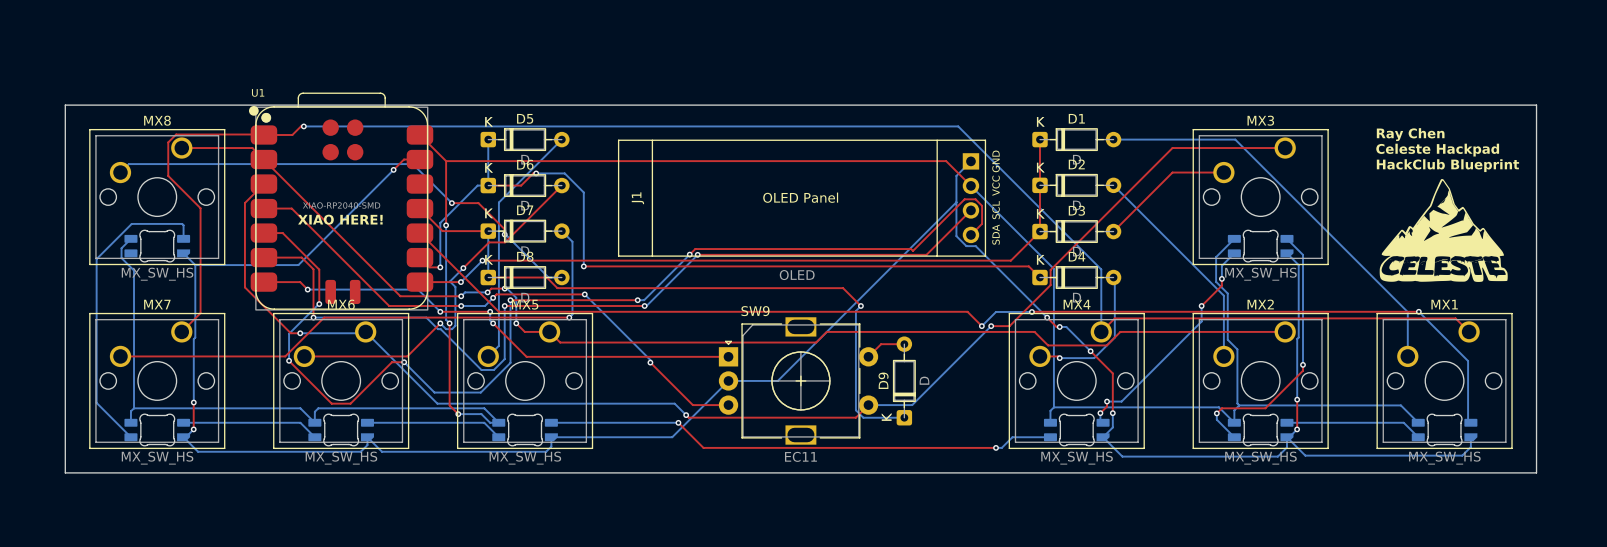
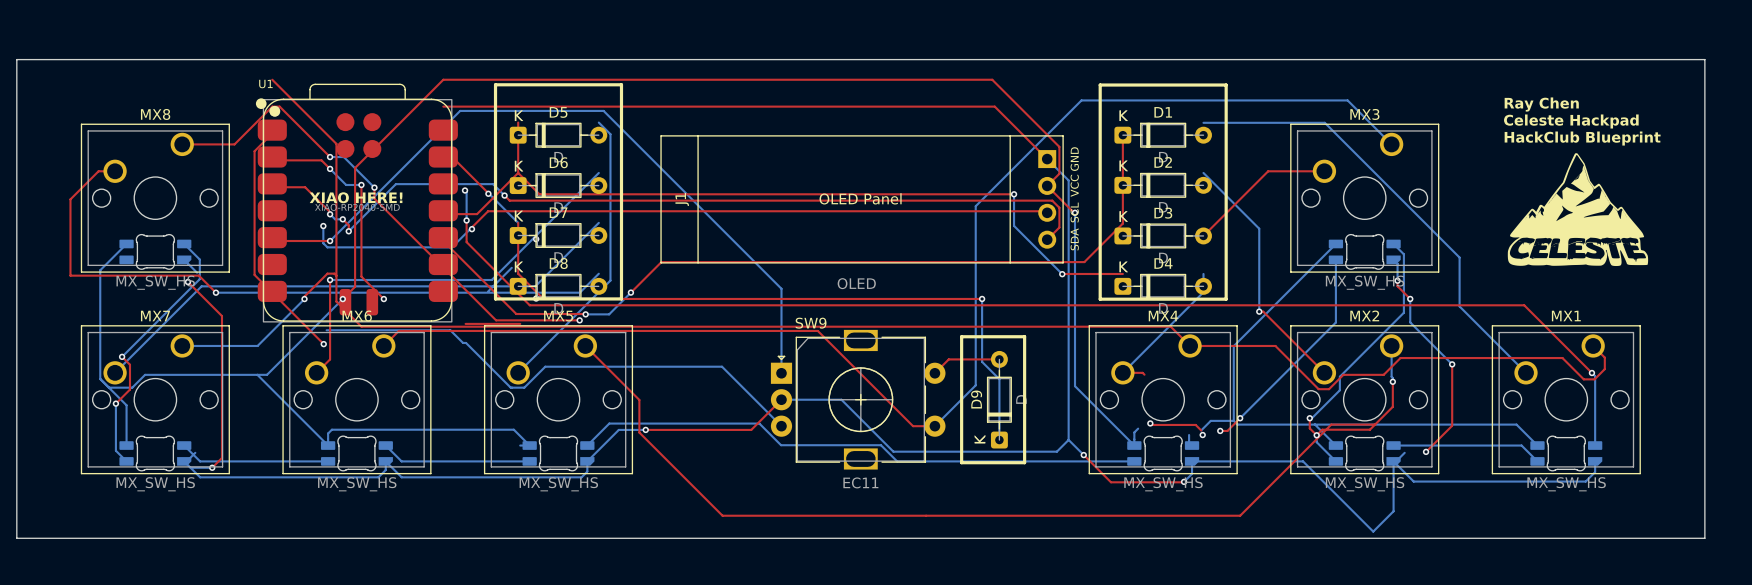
top track: none -> (272, 79) (336, 143) (336, 301) (361, 326) (1170, 326) (1190, 345) (1211, 345)
line: none -> (495, 84) (621, 84) (621, 298) (495, 298) (495, 84)
line: none -> (1100, 85) (1226, 85) (1226, 299) (1100, 299) (1100, 85)
board edge: (65, 105) (1536, 105) (1536, 472) (65, 472) (65, 105) -> (16, 59) (16, 538) (1704, 538) (1704, 59) (16, 59)
top track: none -> (443, 106) (994, 106) (1047, 159)
top track: (303, 126) (300, 126) (292, 134) (176, 134) (168, 142) (168, 175) (200, 208) (200, 313) (181, 331) -> none
bottom track: (303, 126) (958, 126) (1101, 269) (1101, 331) -> none
via: (303, 126) -> none
top track: none -> (518, 122) (518, 172)
top track: (419, 134) (446, 161) -> none
text position: Ray Chen (1410, 134) -> Ray Chen (1541, 104)
top track: none -> (272, 133) (254, 151) (254, 274) (323, 344)
bottom track: (488, 139) (488, 185) (477, 185) (440, 222) (440, 267) -> none
bottom track: (561, 139) (498, 202) (498, 345) -> none
bottom track: (1113, 139) (1235, 139) (1407, 312) (1407, 356) -> (1203, 122) (1324, 122) (1459, 257) (1459, 306) (1525, 372)
top track: (229, 148) (252, 148) (400, 296) (461, 296) -> (234, 144) (272, 106) (279, 106) (330, 157)
top track: (1285, 148) (1172, 148) (1050, 269) (1050, 285) (1009, 326) (991, 326) -> none
text position: Celeste Hackpad (1437, 150) -> Celeste Hackpad (1571, 121)
bottom track: none -> (330, 157) (343, 157) (374, 187)
via: none -> (330, 157)
top track: (419, 159) (403, 159) (393, 169) -> none
top track: (446, 161) (946, 161) (970, 185) -> none
top track: (446, 161) (446, 225) -> none
bottom track: (970, 161) (956, 175) (956, 236) (966, 246) (975, 246) (1047, 317) -> (1047, 159) (1068, 180) (1068, 439)
top track: none -> (272, 160) (321, 160) (330, 168)
top track: none -> (443, 160) (455, 160) (488, 193)
text position: HackClub Blueprint (1447, 165) -> HackClub Blueprint (1582, 138)
bottom track: (393, 169) (298, 265) (195, 265) (193, 402) -> none
via: (393, 169) -> none
bottom track: none -> (330, 168) (346, 184) (361, 184)
via: none -> (330, 168)
top track: none -> (115, 171) (98, 171) (70, 199) (70, 275) (198, 275) (215, 292)
bottom track: (120, 172) (128, 164) (412, 164) (451, 203) -> none
top track: (536, 173) (533, 173) (521, 185) (488, 185) -> none
bottom track: (536, 173) (564, 173) (583, 192) (583, 266) -> none
via: (536, 173) -> none
top track: none -> (518, 172) (539, 194) (1014, 194)
top track: none -> (518, 172) (477, 214) (443, 214)
bottom track: none -> (598, 172) (491, 280) (330, 280)
bottom track: none -> (1203, 172) (1259, 228) (1259, 311)
top track: (263, 184) (244, 203) (244, 287) (290, 333) (300, 333) -> none
top track: none -> (361, 184) (361, 276) (383, 299)
via: none -> (361, 184)
top track: (561, 185) (505, 242) (489, 242) (463, 268) -> none
bottom track: (970, 185) (1053, 268) (1053, 407) (1218, 407) -> (1314, 424) (1319, 428)
bottom track: (1113, 185) (1223, 295) (1223, 356) -> none
top track: none -> (272, 187) (305, 187) (330, 214)
top track: none -> (374, 187) (374, 198) (496, 320) (579, 320)
via: none -> (374, 187)
bottom track: none -> (465, 190) (466, 192) (466, 220)
via: none -> (465, 190)
bottom track: none -> (488, 193) (518, 222)
via: none -> (488, 193)
bottom track: none -> (1014, 194) (1014, 225) (1062, 274)
via: none -> (1014, 194)
bottom track: none -> (504, 195) (493, 184) (395, 184) (348, 231)
via: none -> (504, 195)
top track: (964, 199) (912, 250) (911, 249) (695, 249) (689, 254) -> (1040, 200) (509, 200) (504, 195)
bottom track: (956, 202) (777, 380) -> (1068, 439) (1056, 451) (893, 451) (841, 399) (835, 399)
top track: (451, 203) (478, 203) (504, 229) (504, 234) -> none
via: (451, 203) -> none
top track: (263, 208) (291, 208) (389, 305) (461, 305) -> none
top track: (419, 208) (442, 231) (488, 231) -> none
top track: (970, 210) (926, 254) (697, 254) -> (1047, 212) (1045, 211) (488, 211) (472, 226)
bottom track: none -> (1075, 212) (1075, 386) (1134, 445)
via: none -> (1074, 212)
bottom track: none -> (330, 214) (335, 219) (342, 219)
via: none -> (330, 214)
top track: none -> (1075, 213) (1047, 185) (1059, 173) (1059, 146) (992, 79) (443, 79) (355, 168) (355, 286) (342, 299)
top track: none -> (342, 219) (348, 225) (348, 231)
via: none -> (342, 219)
top track: none -> (466, 220) (466, 242) (529, 305) (1524, 305) (1591, 373)
via: none -> (466, 220)
text position: XIAO HERE! (340, 219) -> XIAO HERE! (356, 197)
top track: none -> (518, 222) (518, 273) (543, 298) (982, 298)
bottom track: none -> (598, 222) (535, 286) (201, 286) (115, 372)
top track: (1039, 220) (1039, 231) (1010, 260) (482, 260) -> (1122, 223) (1084, 262) (661, 262) (630, 292)
bottom track: none -> (323, 226) (323, 243) (327, 247) (451, 247) (472, 226)
via: none -> (323, 226)
bottom track: (446, 225) (446, 319) (449, 323) -> none
via: none -> (348, 231)
drawing position: (1443, 230) -> (1577, 209)
bottom track: (488, 231) (488, 277) -> none
bottom track: (561, 231) (572, 241) -> (598, 122) (610, 134) (610, 247)
top track: (263, 233) (282, 233) (319, 269) (319, 304) -> none
top track: (420, 233) (498, 311) (967, 311) (981, 326) -> none
bottom track: (504, 234) (548, 277) (561, 277) -> none
top track: none -> (272, 241) (330, 241)
bottom track: none -> (330, 241) (460, 110) (603, 110) (781, 288) (781, 373)
via: none -> (330, 241)
top track: none -> (443, 241) (516, 314) (585, 314)
bottom track: (183, 238) (182, 223) (131, 223) (96, 259) (96, 402) (121, 427) -> (184, 243) (199, 259) (199, 279) (122, 356)
bottom track: (121, 248) (121, 258) (134, 270) (134, 408) (130, 411) -> (116, 254) (100, 270) (100, 378) (126, 405) (126, 432)
bottom track: (1296, 248) (1303, 254) (1303, 364) -> (1403, 254) (1403, 312) (1339, 376) (1339, 390) (1309, 418)
bottom track: (1234, 253) (1221, 265) (1221, 278) -> (1335, 259) (1335, 322) (1240, 418)
bottom track: (689, 254) (644, 300) (637, 300) -> none
via: (689, 254) -> none
bottom track: (697, 254) (644, 305) -> none
via: (697, 254) -> none
bottom track: (1290, 256) (1298, 265) (1297, 399) -> (1397, 263) (1397, 280)
top track: (263, 257) (301, 257) (313, 269) (313, 317) -> none
top track: (419, 257) (429, 267) (440, 267) -> none
bottom track: (1216, 257) (1216, 281) (1227, 293) (1227, 339) (1237, 349) (1237, 403) (1239, 405) -> (1315, 263) (1233, 346) (1233, 420)
via: (482, 260) -> none
bottom track: none -> (598, 273) (579, 292) (215, 292)
top track: (583, 266) (1028, 266) (1039, 277) -> none
via: (583, 266) -> none
via: none -> (1062, 274)
top track: none -> (1122, 273) (1062, 274)
bottom track: none -> (1203, 273) (1203, 292) (1122, 372)
top track: none -> (336, 275) (334, 273) (327, 273) (304, 296) (304, 299)
via: (440, 267) -> none
bottom track: (463, 268) (449, 281) (455, 286) (455, 325) (452, 329) (446, 329) (440, 323) -> none
via: (463, 268) -> none
via: none -> (330, 280)
bottom track: (572, 272) (572, 314) (569, 317) -> (610, 280) (529, 361)
top track: none -> (1397, 280) (1397, 286) (1410, 298)
via: none -> (1397, 280)
top track: none -> (187, 282) (221, 316) (221, 458) (212, 467)
via: none -> (187, 282)
top track: (488, 277) (546, 277) (557, 288) (843, 288) (860, 305) -> none
bottom track: (1113, 277) (1114, 337) (1094, 358) (1059, 358) -> none
top track: (1221, 278) (1221, 285) (1201, 305) -> none
via: (1221, 278) -> none
top track: (263, 282) (300, 282) (307, 289) -> none
top track: (419, 282) (460, 282) -> none
via: (460, 282) -> none
via: none -> (215, 292)
bottom track: none -> (630, 292) (609, 314) (585, 314)
via: none -> (630, 292)
top track: (504, 288) (491, 288) (487, 292) -> none
bottom track: (504, 288) (516, 297) (516, 323) -> none
bottom track: none -> (304, 299) (257, 345) (182, 345)
via: none -> (304, 299)
bottom track: (307, 289) (418, 289) (440, 311) -> none
via: (307, 289) -> none
bottom track: none -> (342, 299) (267, 374) (145, 374) (132, 387) (108, 387)
via: none -> (342, 299)
via: none -> (383, 299)
bottom track: none -> (982, 298) (982, 361) (999, 379) (999, 440)
via: none -> (982, 298)
bottom track: none -> (1410, 298) (1410, 322) (1452, 364)
via: none -> (1410, 298)
bottom track: (487, 292) (465, 292) (461, 296) -> none
via: (487, 292) -> none
top track: (584, 294) (496, 294) (493, 297) -> none
bottom track: (584, 294) (650, 360) (650, 362) -> none
via: (584, 294) -> none
via: (461, 296) -> none
bottom track: (493, 297) (484, 305) (461, 305) -> none
via: (493, 297) -> none
top track: (510, 300) (637, 300) -> none
bottom track: (510, 300) (510, 362) (480, 392) (434, 392) (404, 362) -> none
via: (510, 300) -> none
via: (637, 300) -> none
top track: none -> (1259, 311) (1263, 311) (1324, 372)
via: none -> (1259, 311)
via: none -> (585, 314)
bottom track: (319, 304) (289, 333) (289, 360) -> none
via: (319, 304) -> none
via: (461, 305) -> none
top track: (504, 305) (644, 305) -> none
bottom track: (504, 305) (504, 359) -> (781, 426) (722, 366) (545, 366) (536, 375)
via: (504, 305) -> none
via: (644, 305) -> none
bottom track: (860, 305) (855, 310) (855, 410) (863, 417) (904, 417) -> none
via: (860, 305) -> none
bottom track: (1201, 305) (1201, 321) (1121, 401) (1107, 401) -> none
via: (1201, 305) -> none
via: none -> (579, 320)
via: (440, 311) -> none
bottom track: (490, 311) (490, 320) (493, 323) -> none
via: (490, 311) -> none
bottom track: (1031, 311) (996, 311) (981, 326) -> none
via: (1031, 311) -> none
top track: (1418, 311) (1031, 311) -> none
bottom track: (1418, 311) (1468, 361) (1468, 419) (1470, 422) -> (1591, 373) (1595, 376) (1595, 445)
via: (1418, 311) -> none
via: (313, 317) -> none
top track: (569, 317) (324, 317) (285, 356) (120, 356) -> none
via: (569, 317) -> none
top track: (1047, 317) (1056, 326) (1059, 326) -> none
via: (1047, 317) -> none
top track: (440, 323) (407, 356) (304, 356) -> (330, 280) (330, 359) (316, 372)
via: (440, 323) -> none
top track: (449, 323) (449, 405) (458, 414) -> none
via: (449, 323) -> none
top track: (493, 323) (526, 356) (728, 356) -> none
via: (493, 323) -> none
top track: (516, 323) (524, 331) (549, 331) -> none
via: (516, 323) -> none
line: none -> (961, 336) (1024, 336) (1024, 462) (961, 462) (961, 336)
via: (981, 326) -> none
bottom track: (991, 326) (912, 405) (868, 405) -> (1391, 144) (1347, 100) (1081, 100) (975, 206) (975, 385) (934, 426)
via: (991, 326) -> none
bottom track: (1059, 326) (1066, 326) (1090, 351) -> none
via: (1059, 326) -> none
via: none -> (323, 344)
top track: (1101, 331) (1114, 318) (1455, 318) (1469, 331) -> (1275, 345) (1318, 389) (1329, 389) (1343, 374) (1383, 374) (1400, 358) (1562, 358) (1583, 379) (1594, 379) (1604, 369) (1604, 357) (1593, 345)
top track: (1120, 331) (1106, 345) (1048, 345) (1034, 331) (826, 331) (816, 342) (560, 342) -> (1375, 424) (1331, 424) (1240, 515) (722, 515) (639, 432) (639, 399) (597, 357)
top track: (1179, 331) (1285, 331) -> none
bottom track: none -> (1391, 345) (1392, 381)
bottom track: (300, 333) (365, 331) (437, 403) (674, 403) (686, 415) -> none
via: (300, 333) -> none
top track: none -> (122, 356) (129, 364) (129, 389) (115, 403)
via: none -> (122, 356)
top track: none -> (974, 359) (999, 359)
top track: none -> (1452, 364) (1452, 425) (1426, 451)
via: none -> (1452, 364)
top track: (1090, 351) (1112, 373) (1112, 413) -> none
via: (1090, 351) -> none
via: none -> (1591, 373)
via: (1059, 358) -> none
top track: (289, 360) (331, 403) (350, 403) (391, 362) (404, 362) -> none
via: (289, 360) -> none
via: (404, 362) -> none
top track: (650, 362) (692, 405) (728, 405) -> none
via: (650, 362) -> none
top track: (1303, 364) (1303, 370) (1286, 387) -> (1392, 381) (1392, 406)
via position: (1303, 364) -> (1392, 381)
top track: none -> (781, 399) (751, 429) (645, 429)
bottom track: (728, 380) (672, 437) (551, 437) -> (645, 429) (618, 429) (587, 461)
D9 position: (904, 380) -> (999, 399)
bottom track: none -> (115, 403) (115, 450)
via: none -> (115, 403)
top track: none -> (1240, 418) (1227, 430) (1220, 430)
via: none -> (1240, 418)
top track: none -> (1309, 418) (1309, 428) (1314, 432)
via: none -> (1309, 418)
top track: (1297, 399) (1297, 429) -> none
via: (1297, 399) -> none
bottom track: none -> (1233, 420) (1210, 420) (1201, 430)
top track: (1107, 401) (1107, 406) (1100, 413) -> none
via: (1107, 401) -> none
top track: (193, 402) (193, 429) -> none
via: (193, 402) -> none
top track: none -> (1150, 423) (1195, 424) (1201, 430)
via: none -> (1150, 423)
top track: (868, 405) (855, 417) (688, 417) (686, 415) -> (934, 426) (913, 426) (817, 330) (398, 330) (383, 345)
bottom track: (1239, 405) (1400, 405) -> (1233, 420) (1237, 424) (1516, 424) (1518, 426)
bottom track: (1239, 405) (1234, 410) (1234, 422) -> none
bottom track: (133, 408) (300, 408) -> (257, 374) (312, 429)
via: none -> (645, 429)
via: none -> (1220, 430)
via: (1100, 413) -> none
bottom track: (1112, 413) (1112, 427) (1103, 437) (1122, 456) (1277, 456) (1286, 447) -> (1184, 481) (1192, 473) (1192, 461) (1303, 461) (1373, 531) (1393, 511) (1393, 472)
bottom track: (458, 414) (481, 414) (490, 422) -> none
via: (458, 414) -> none
via: (686, 415) -> none
bottom track: none -> (1068, 439) (1083, 455)
bottom track: (183, 422) (300, 422) (314, 437) -> (184, 445) (200, 461) (328, 461)
bottom track: (367, 422) (484, 422) (498, 437) -> (385, 445) (401, 461) (529, 461)
bottom track: (551, 422) (678, 422) -> (587, 445) (609, 423) (759, 423) (781, 445) (880, 445) (897, 461) (1092, 461)
top track: (678, 422) (703, 447) (996, 447) -> none
via: (678, 422) -> none
via: none -> (1426, 451)
via position: (193, 429) -> (212, 467)
via: (1297, 429) -> none
top track: none -> (1083, 455) (1111, 482) (1184, 481)
bottom track: (1012, 437) (1001, 447) (996, 447) -> none
bottom track: none -> (190, 467) (212, 467)
via position: (996, 447) -> (1083, 455)
via: none -> (1184, 481)

